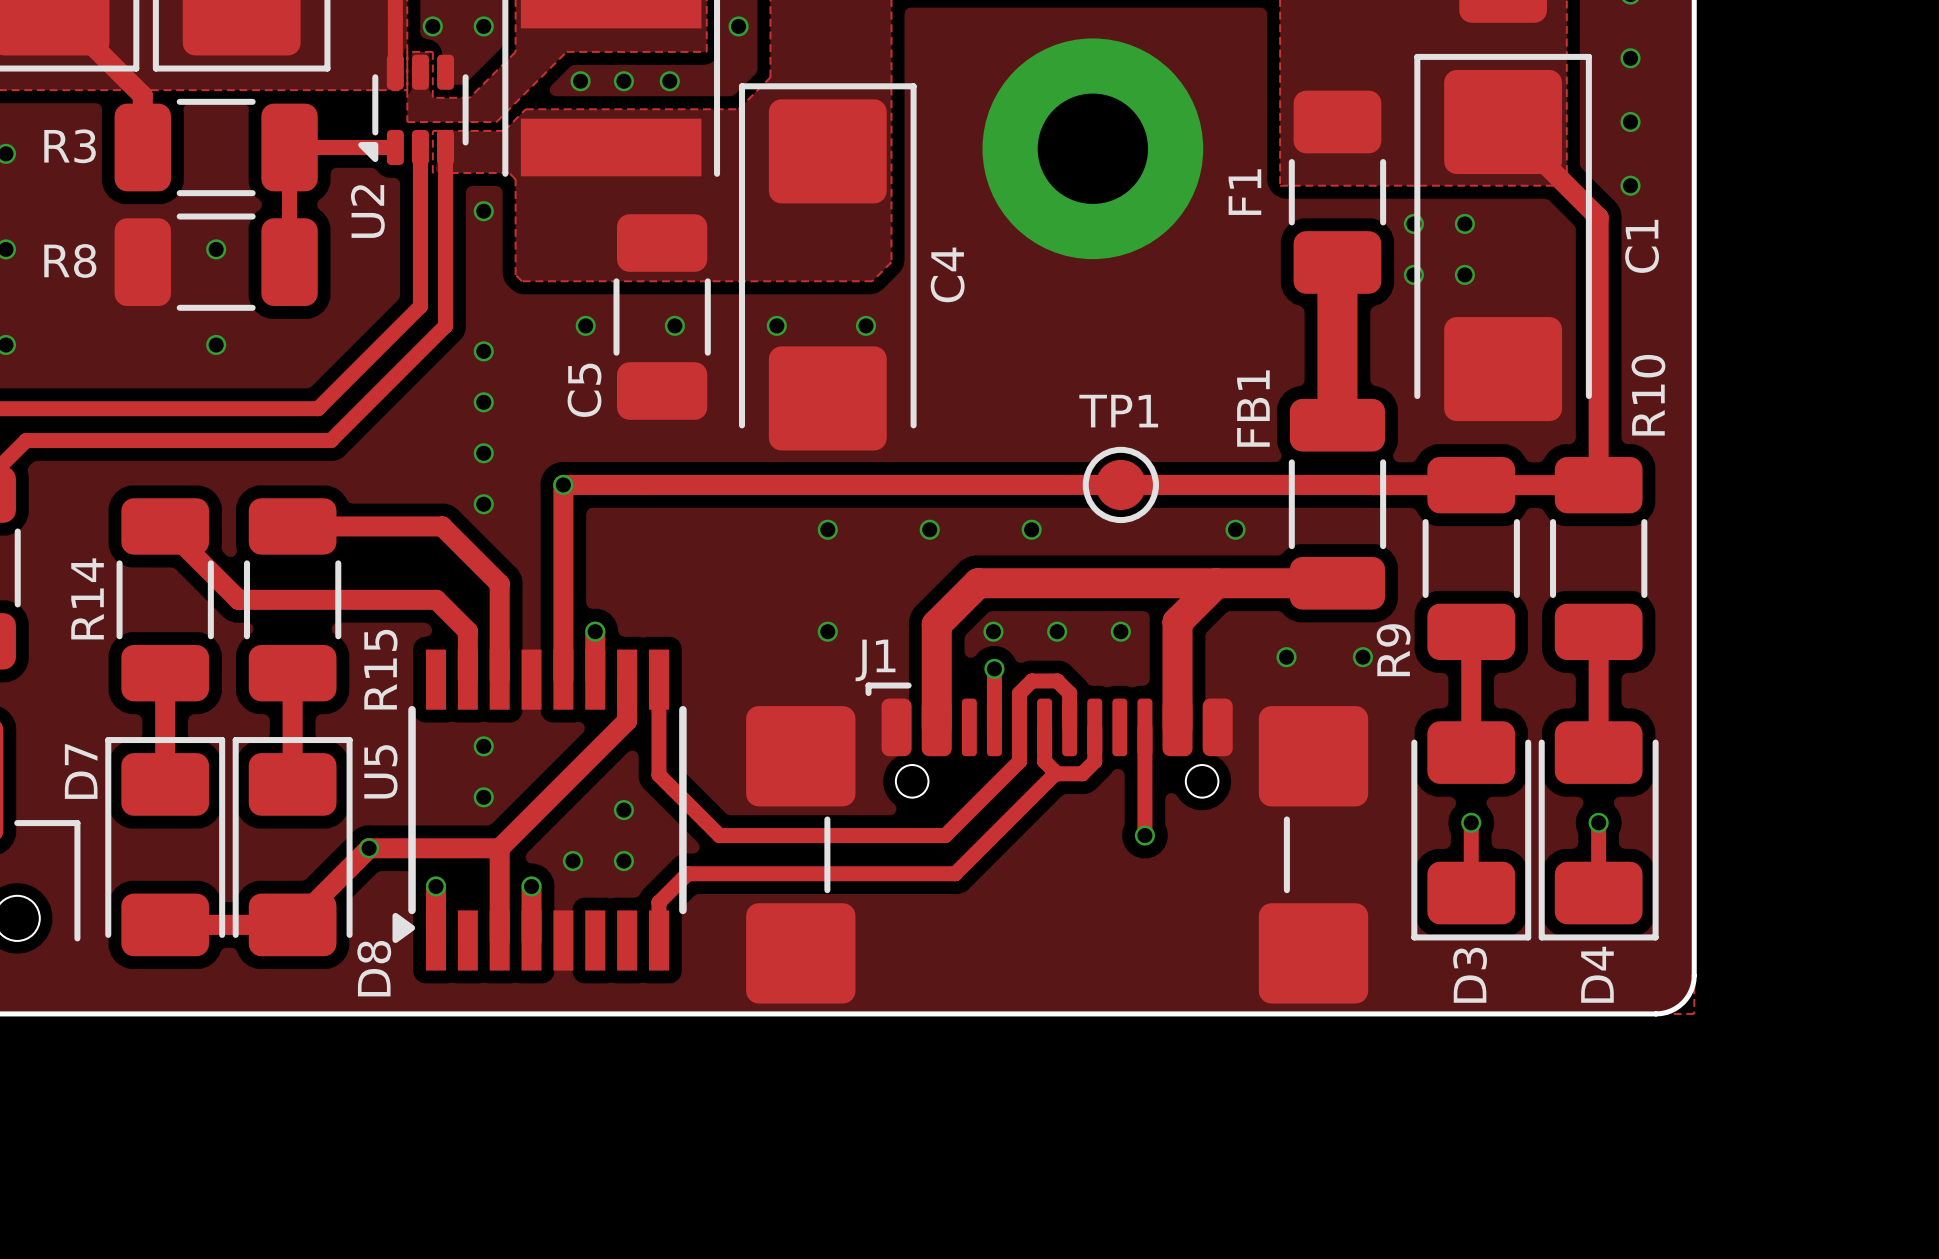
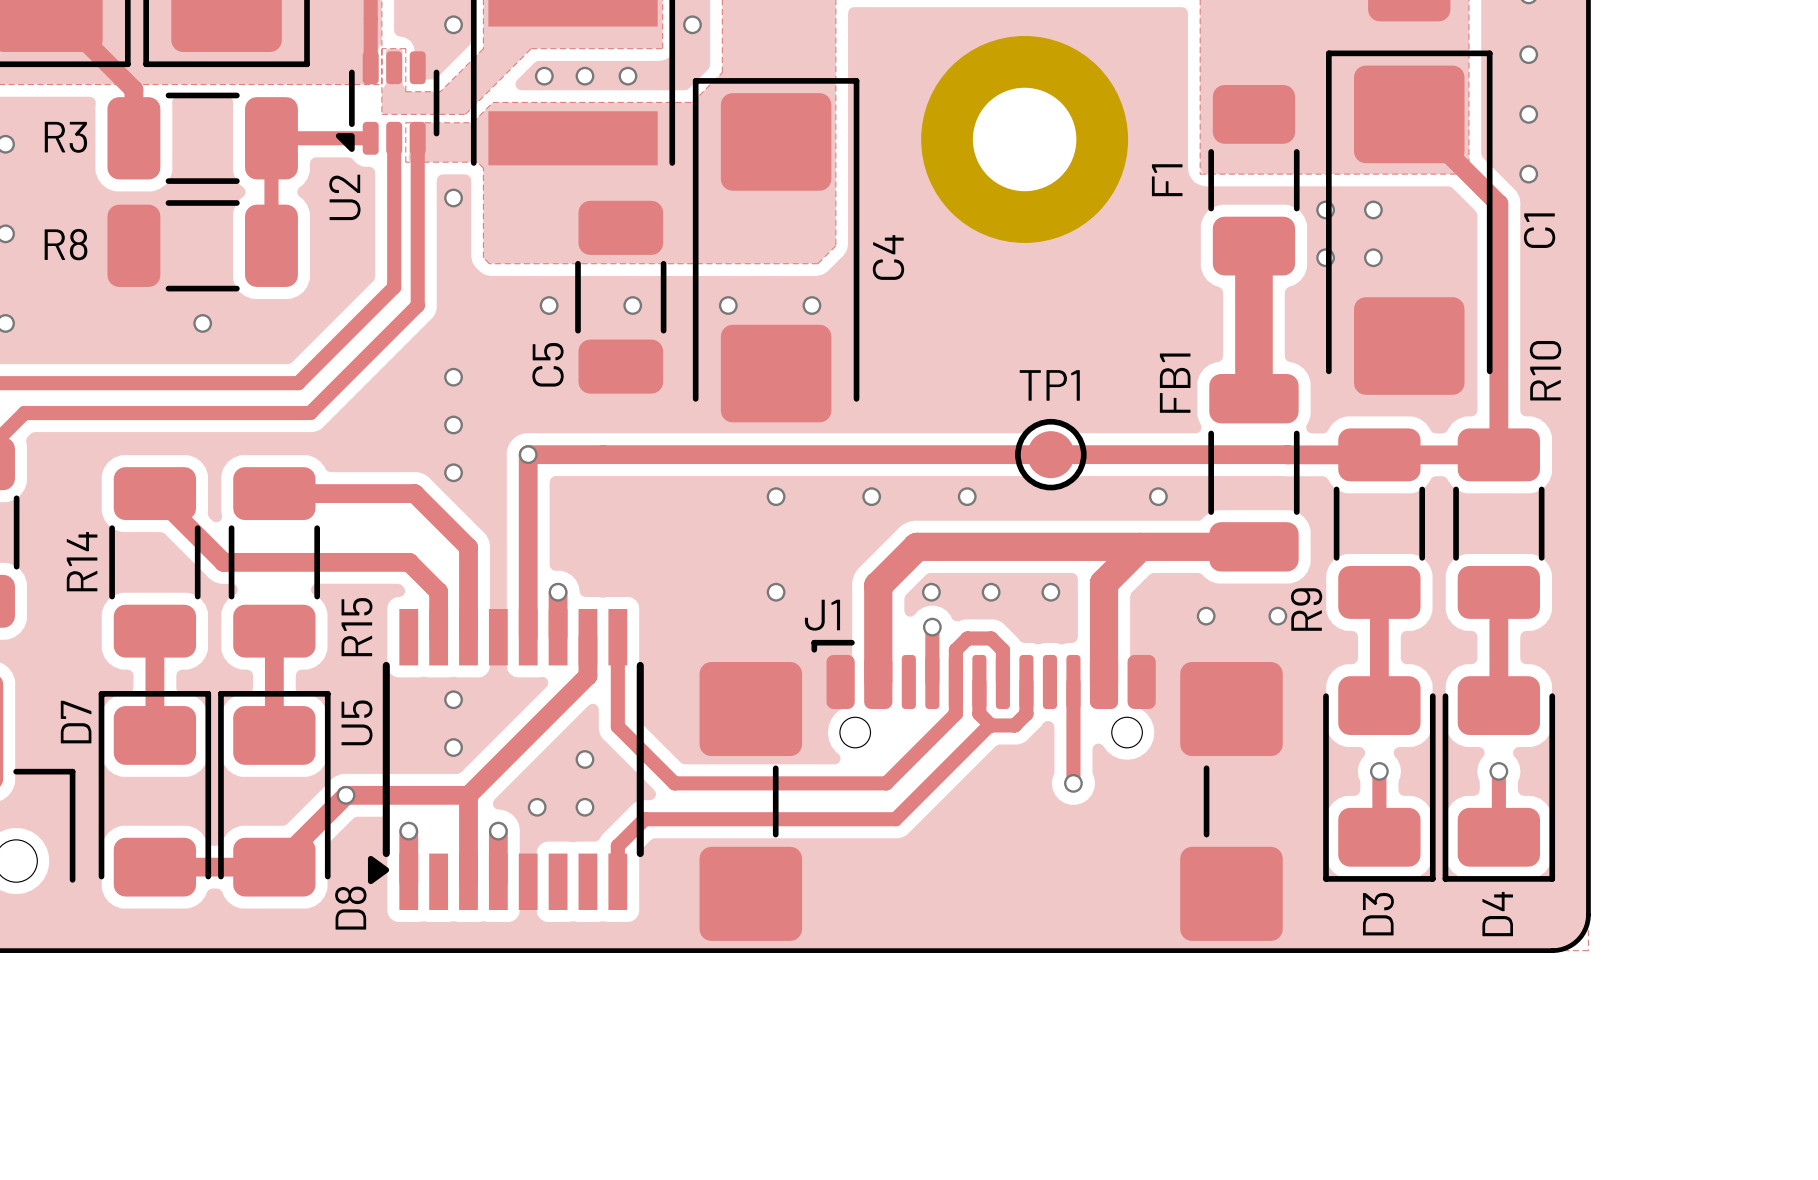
via: (432, 26) -> none
via: (216, 249) -> none
via: (483, 351) -> none

